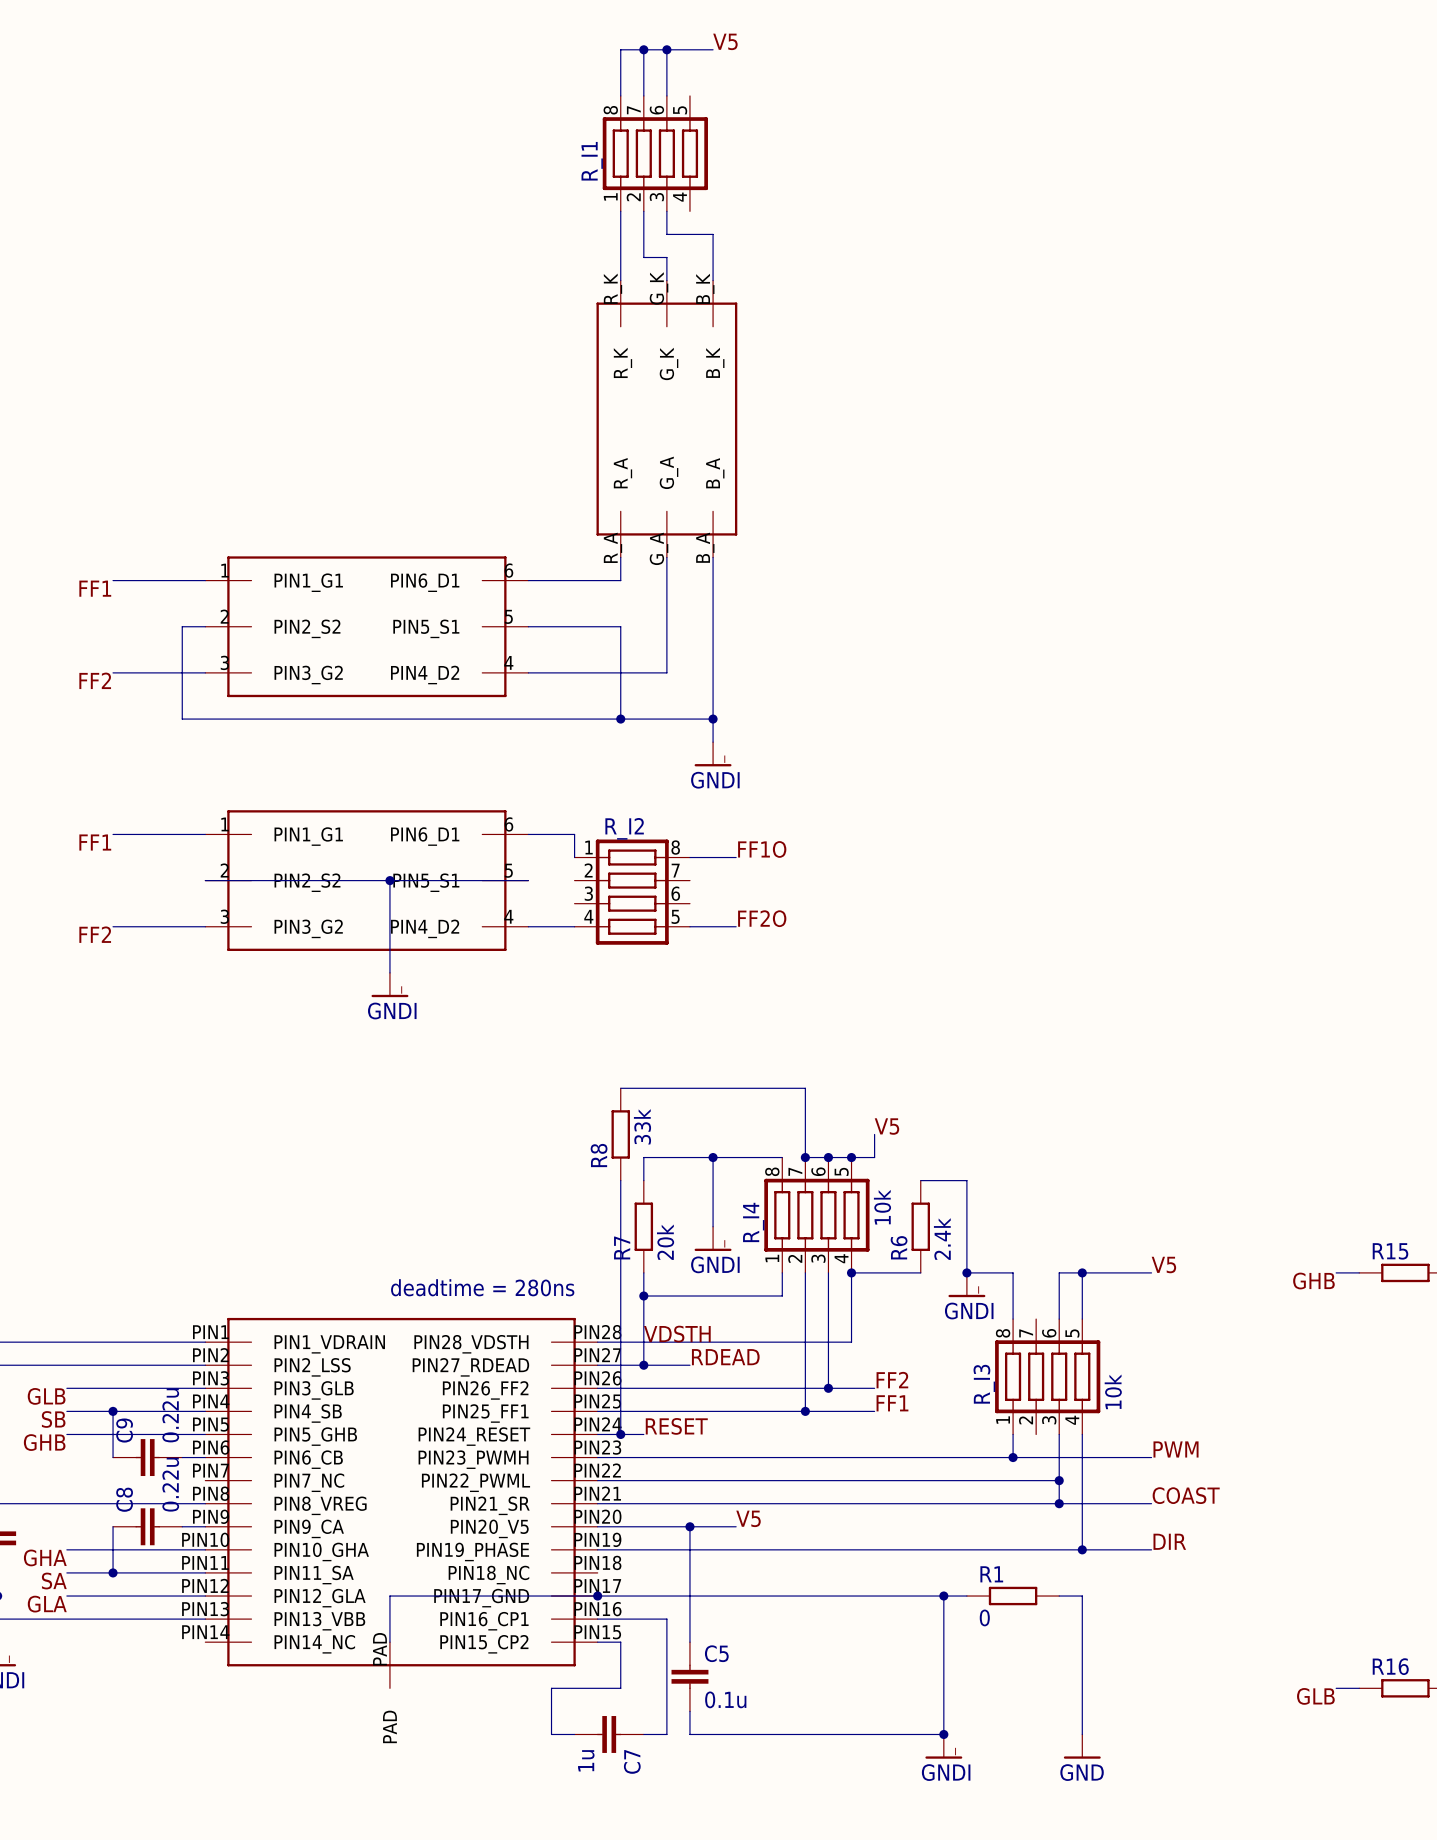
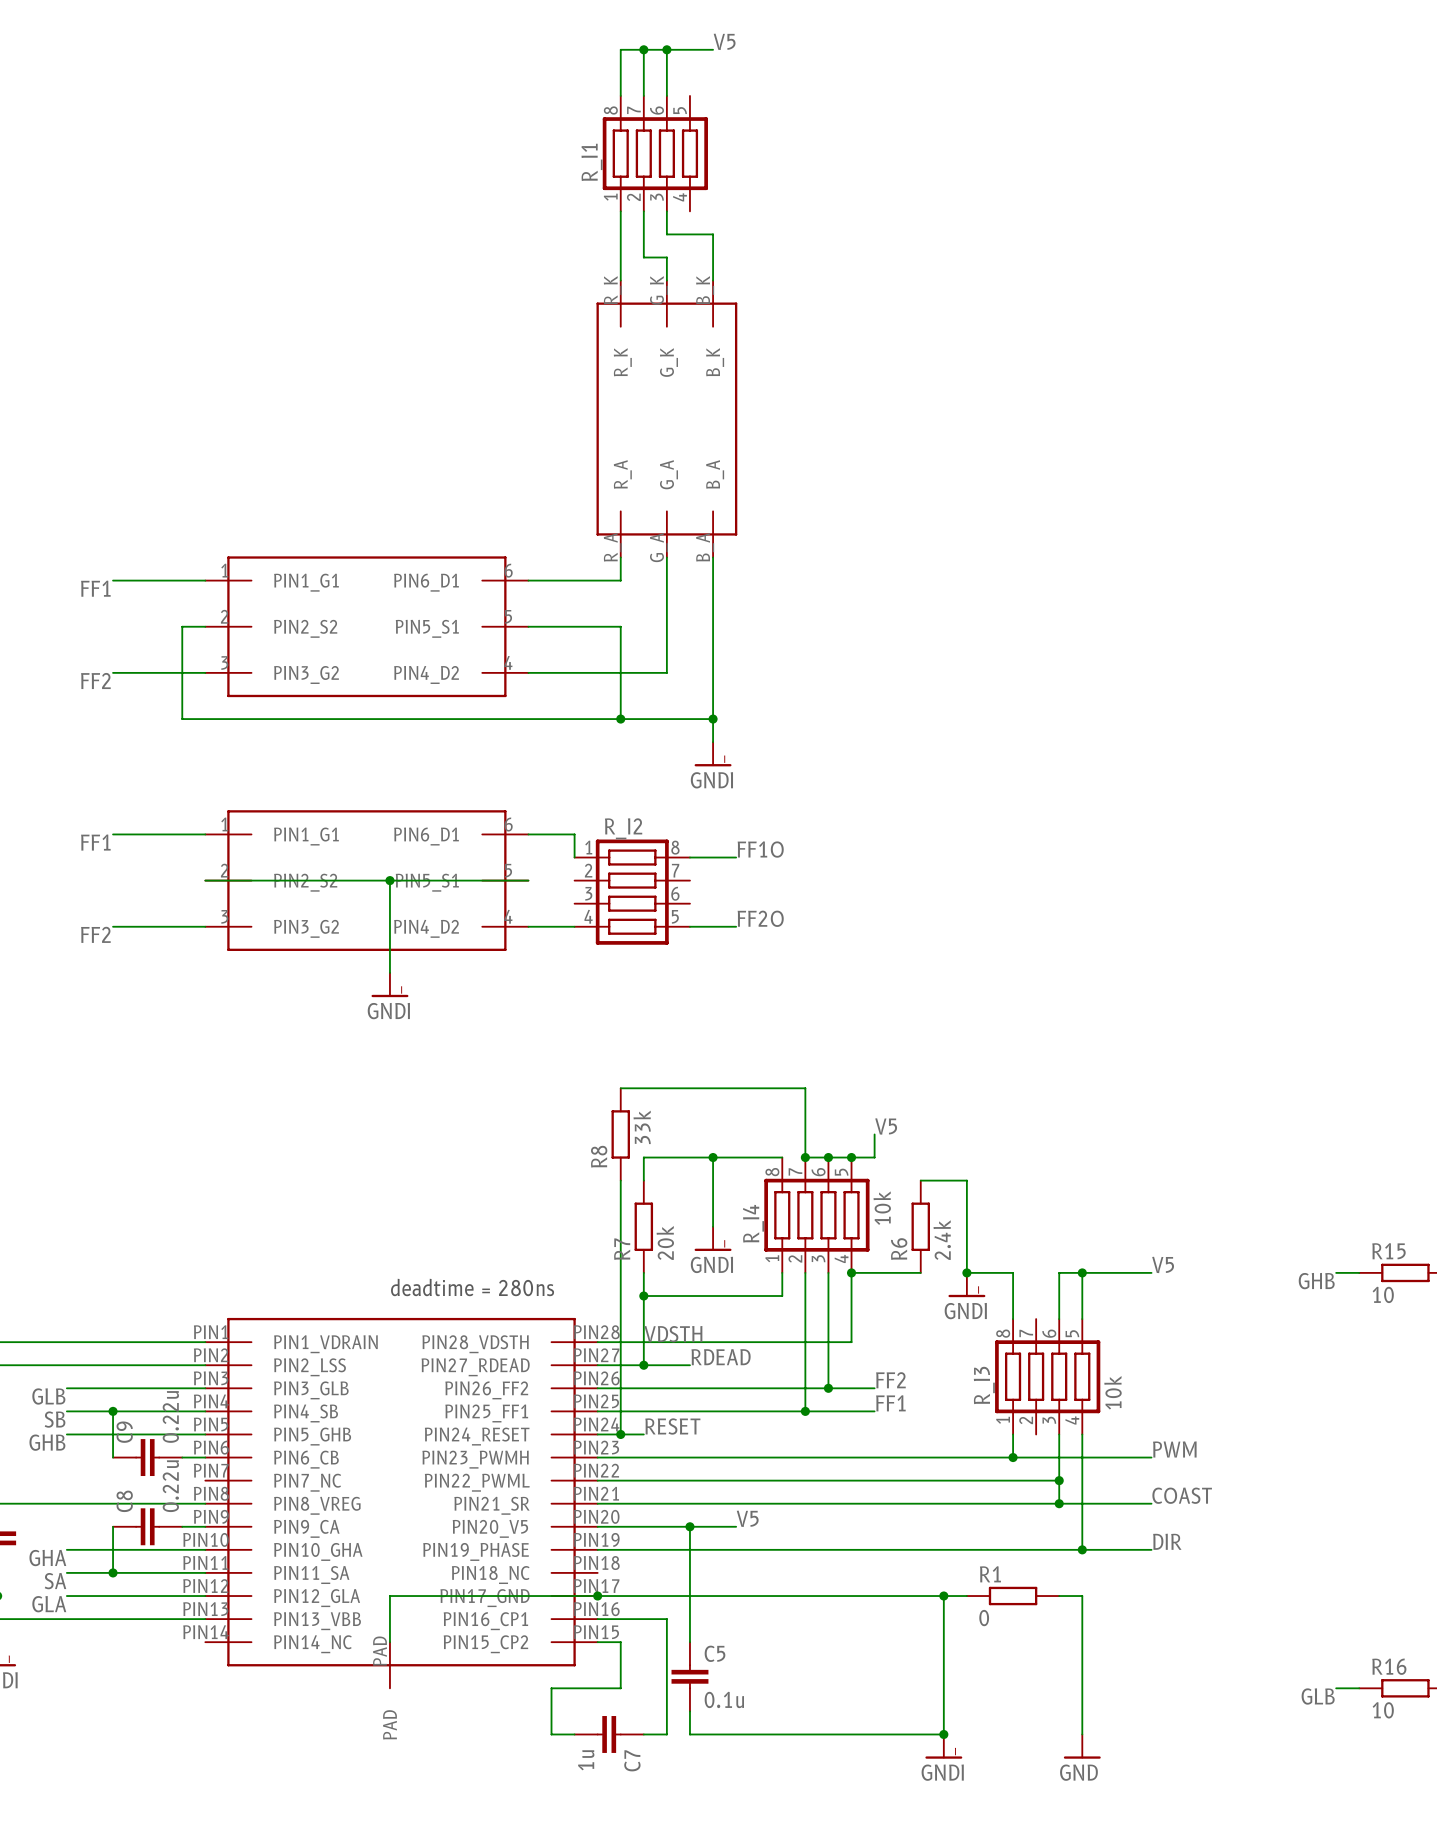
R15 value: none -> 10 (1383, 1294)
R16 value: none -> 10 (1383, 1710)

